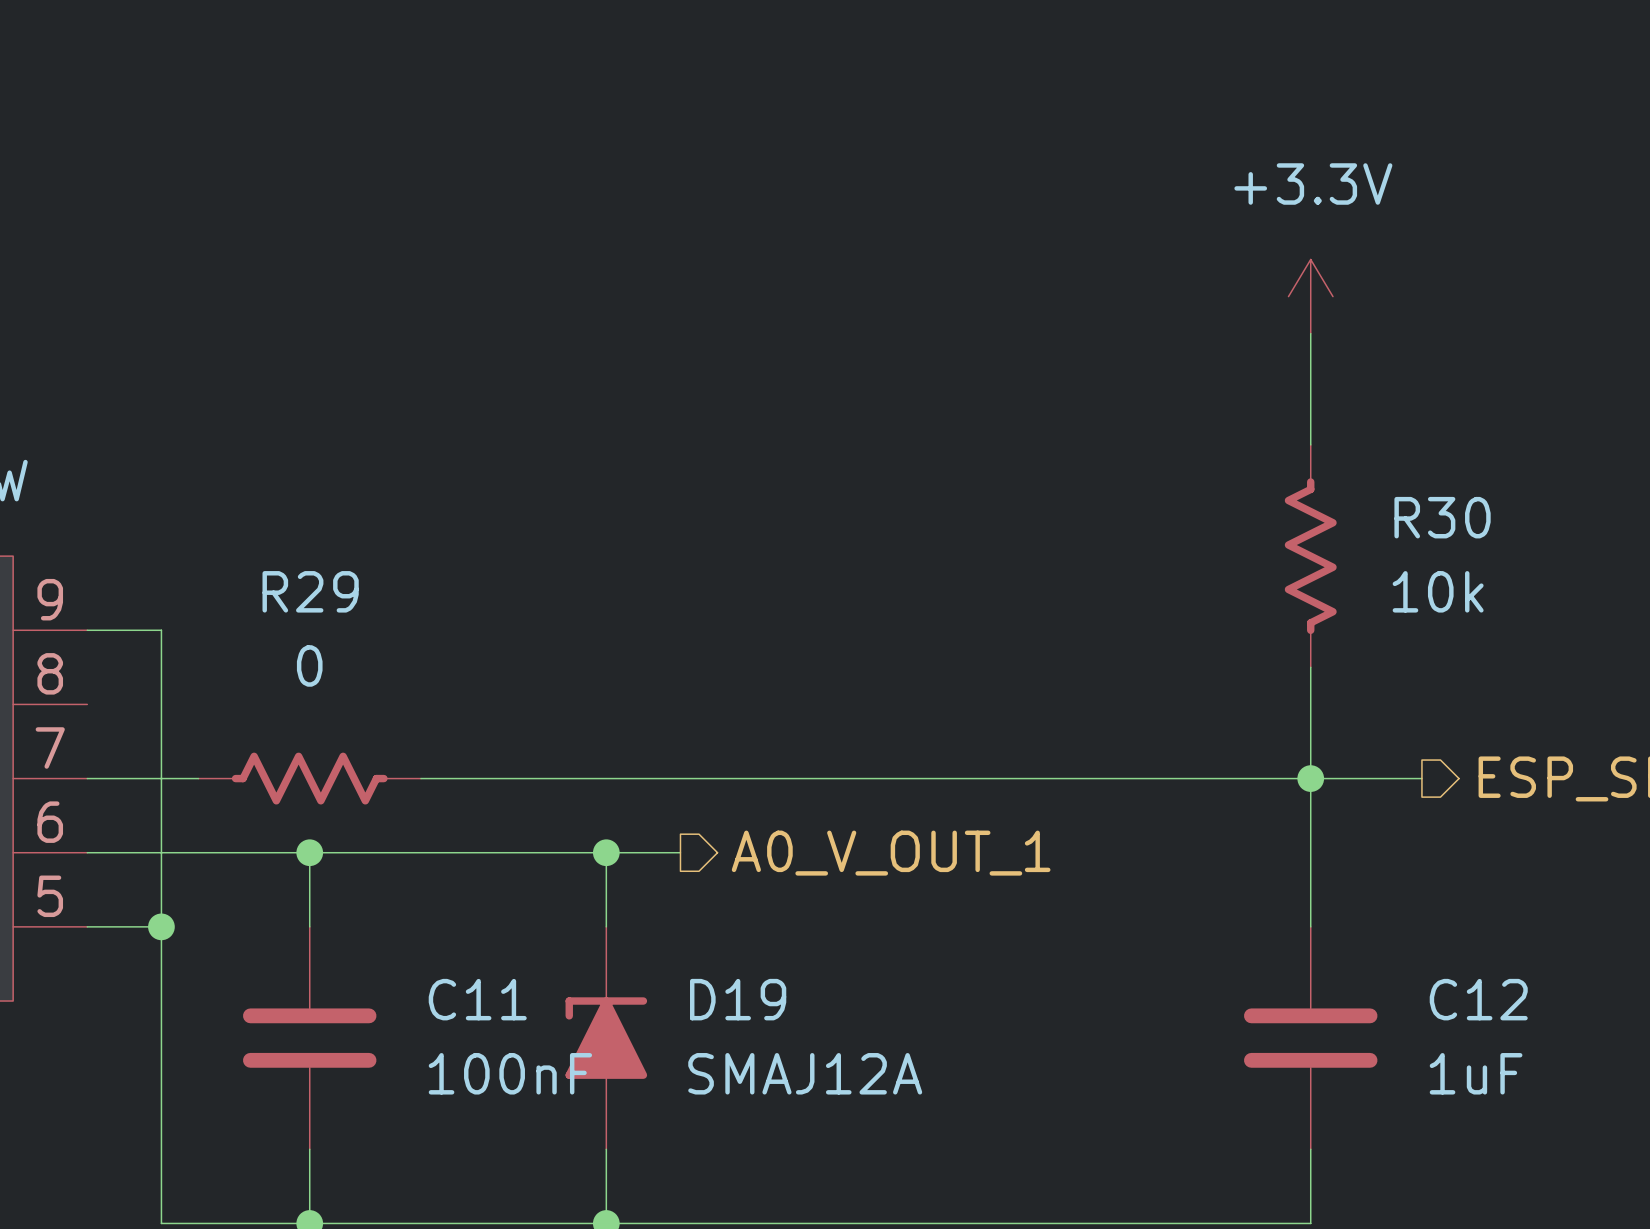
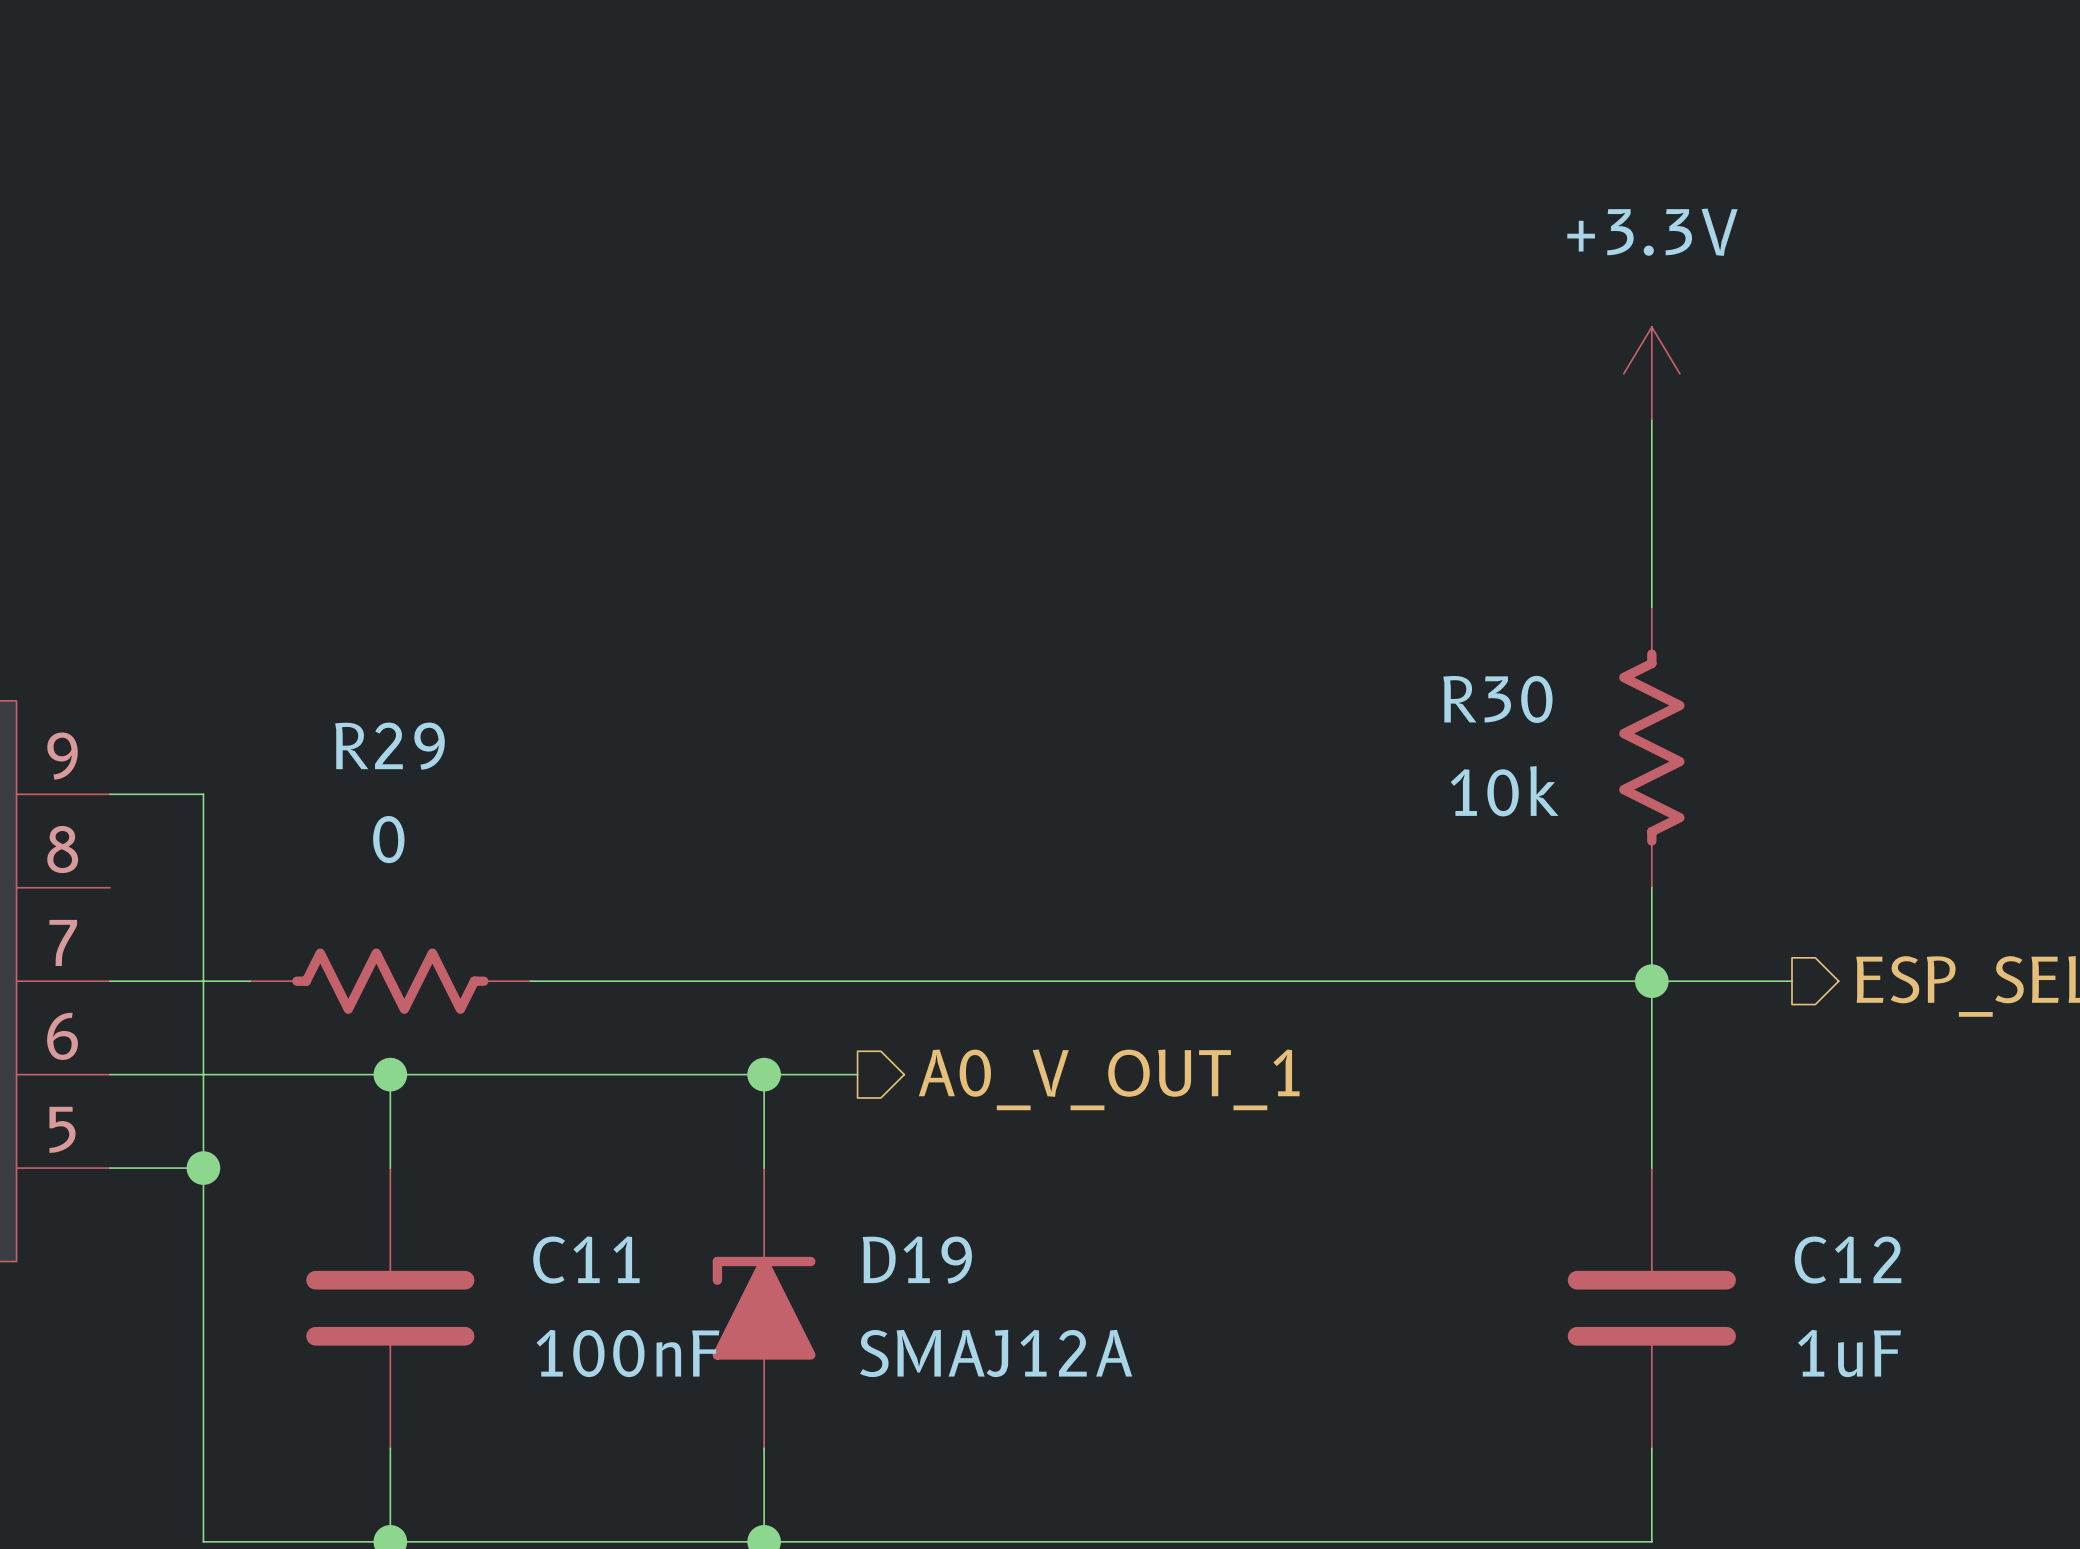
R30 name position: R30 (1442, 517) -> R30 (1497, 699)
R30 position: (1310, 556) -> (1651, 747)
R30 value position: 10k (1438, 591) -> 10k (1504, 791)

